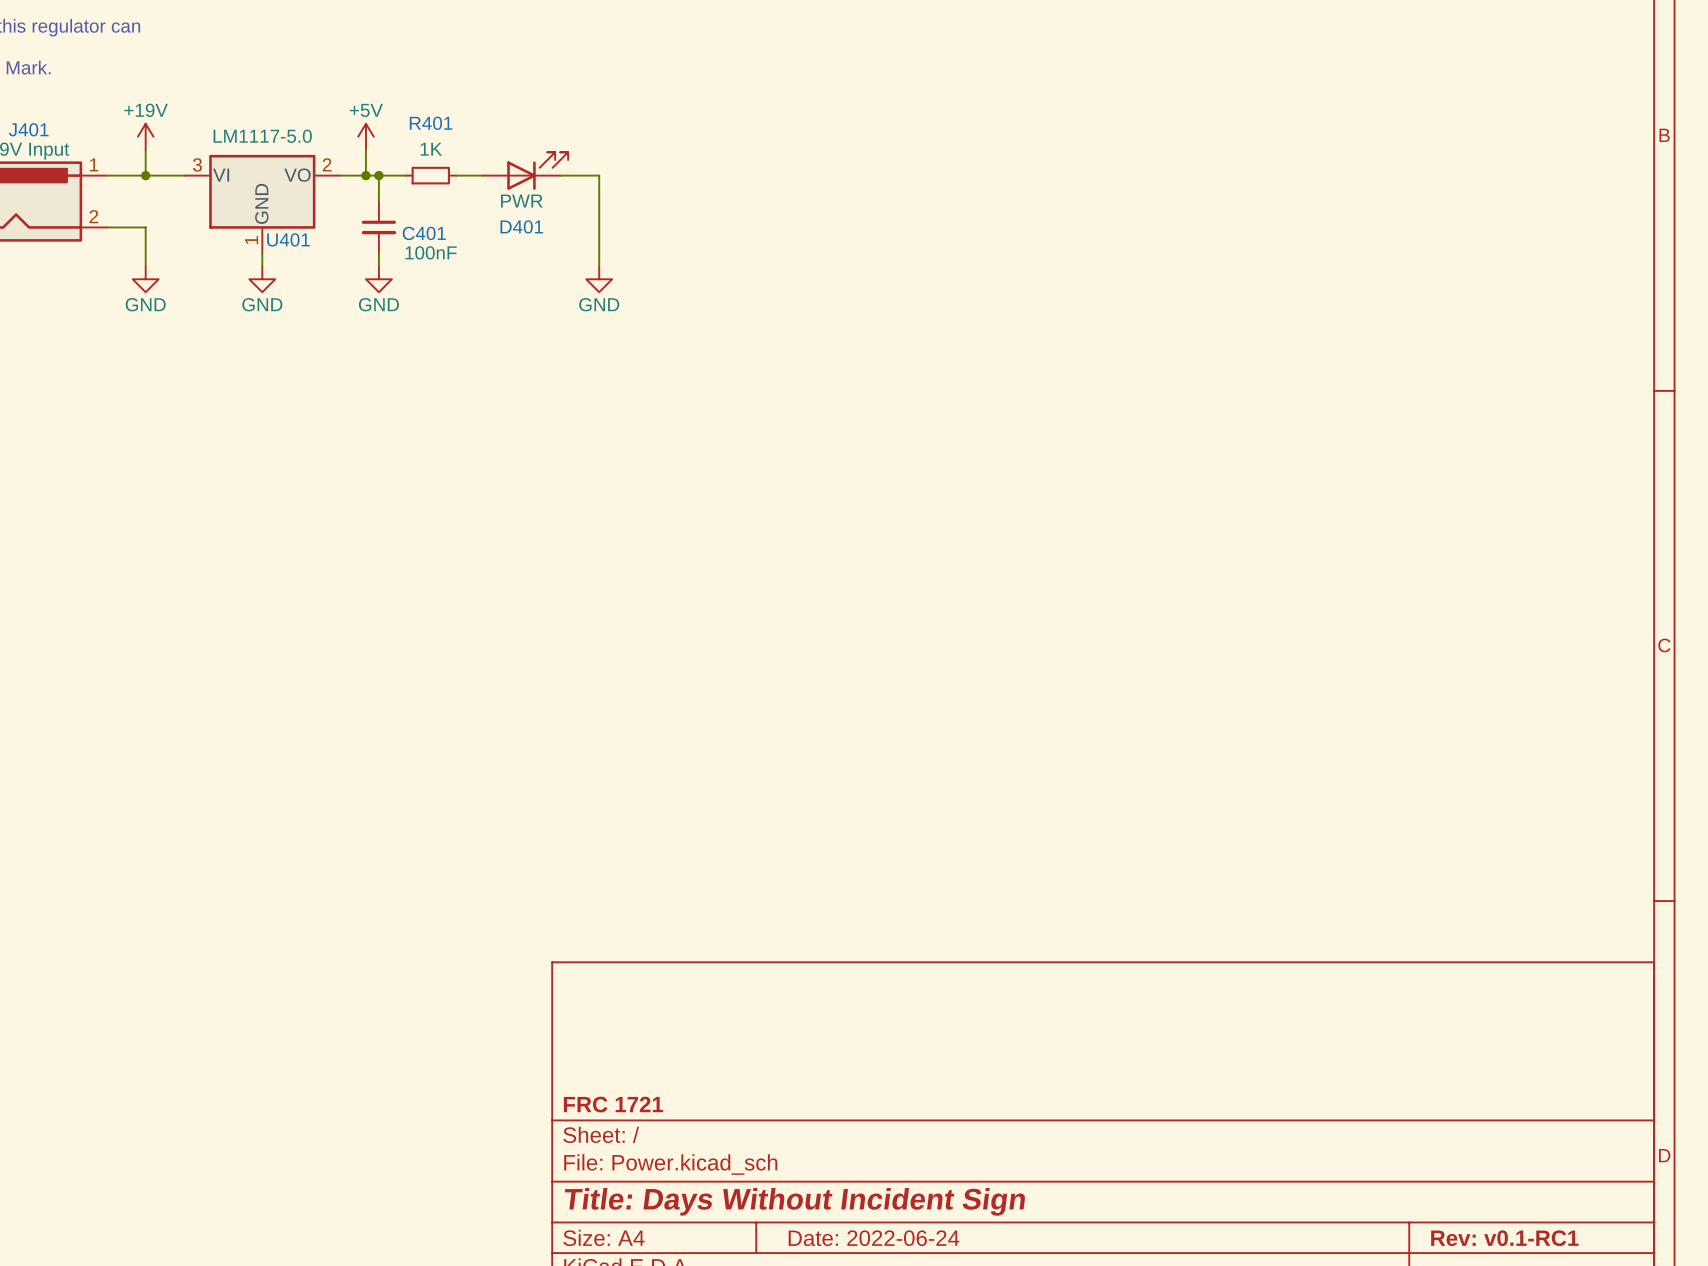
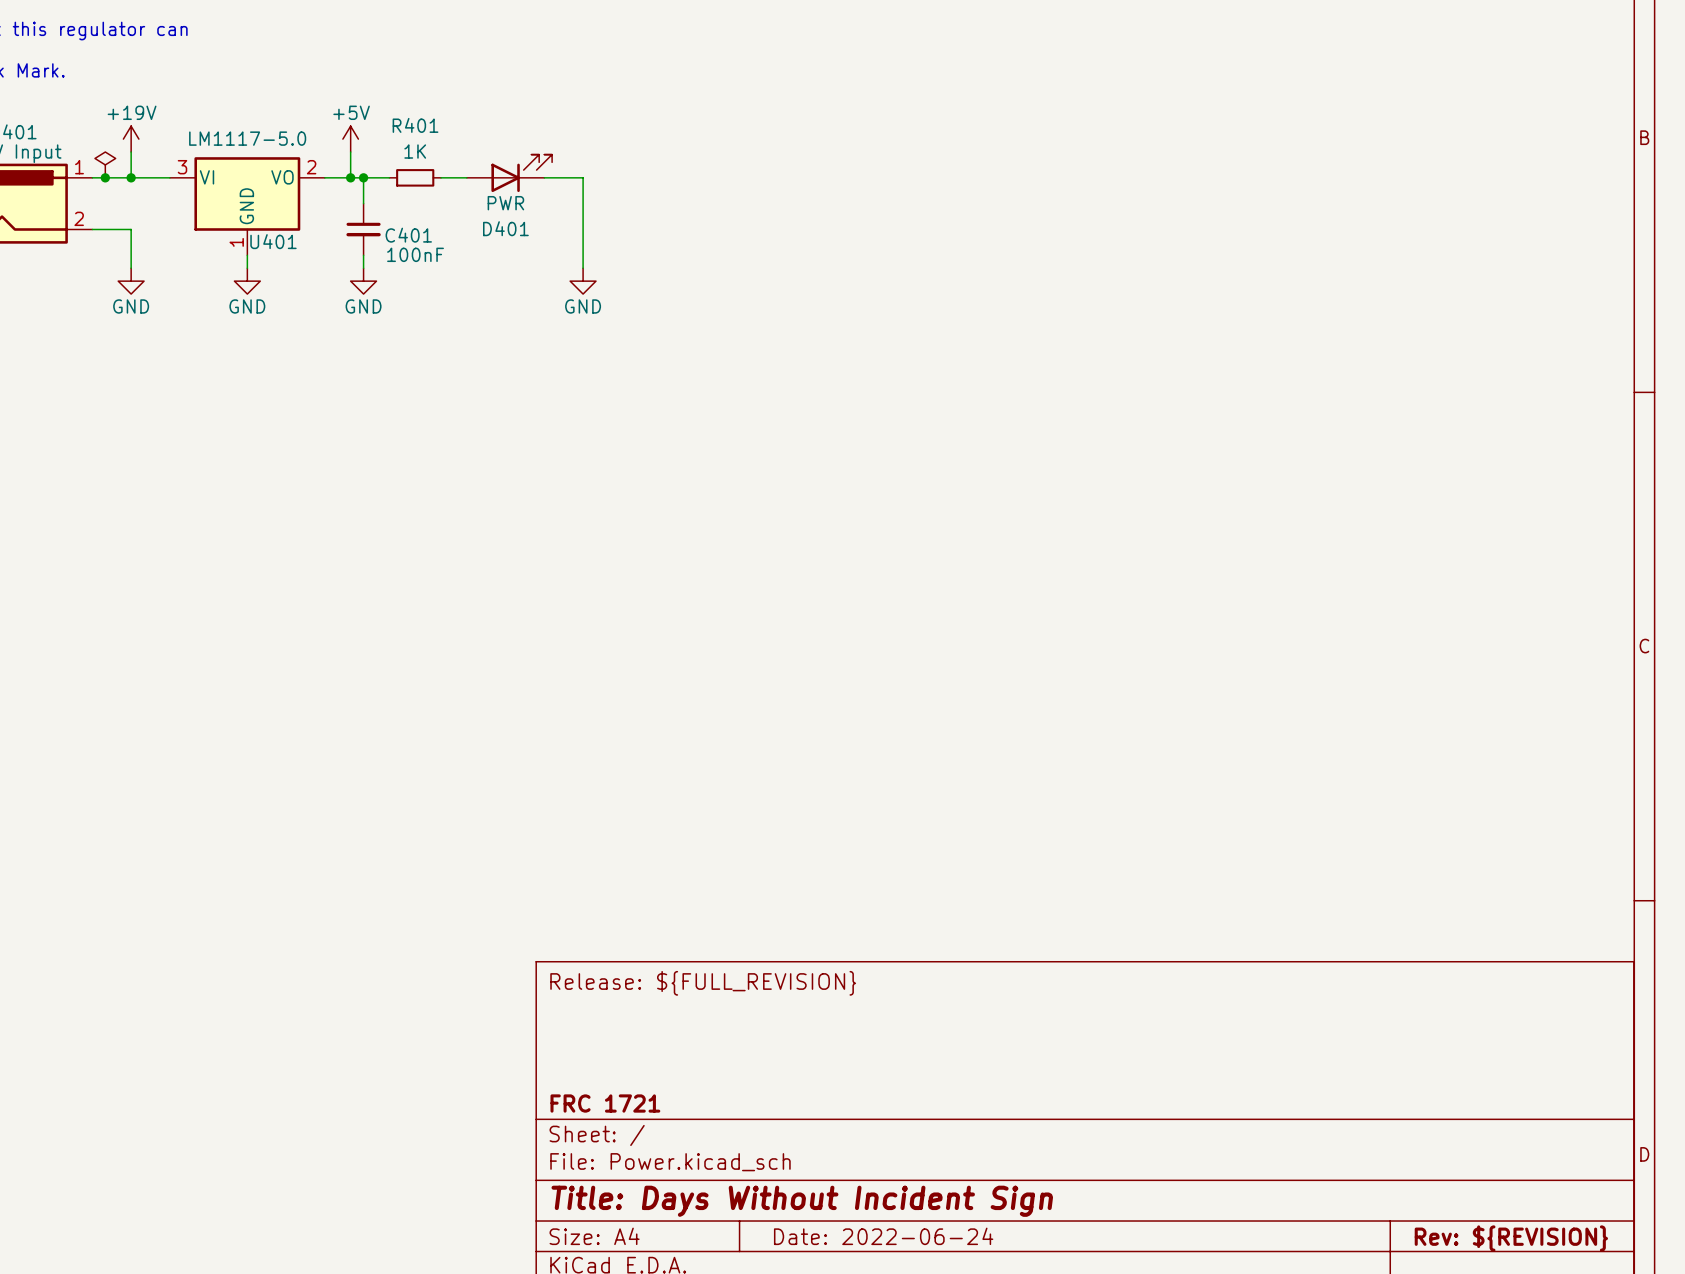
power symbol: none -> (105, 164)
junction: none -> (105, 177)
title block: none -> Release: ${FULL_REVISION} (703, 983)
title block: Rev: v0.1-RC1 (1504, 1238) -> Rev: ${REVISION} (1511, 1238)

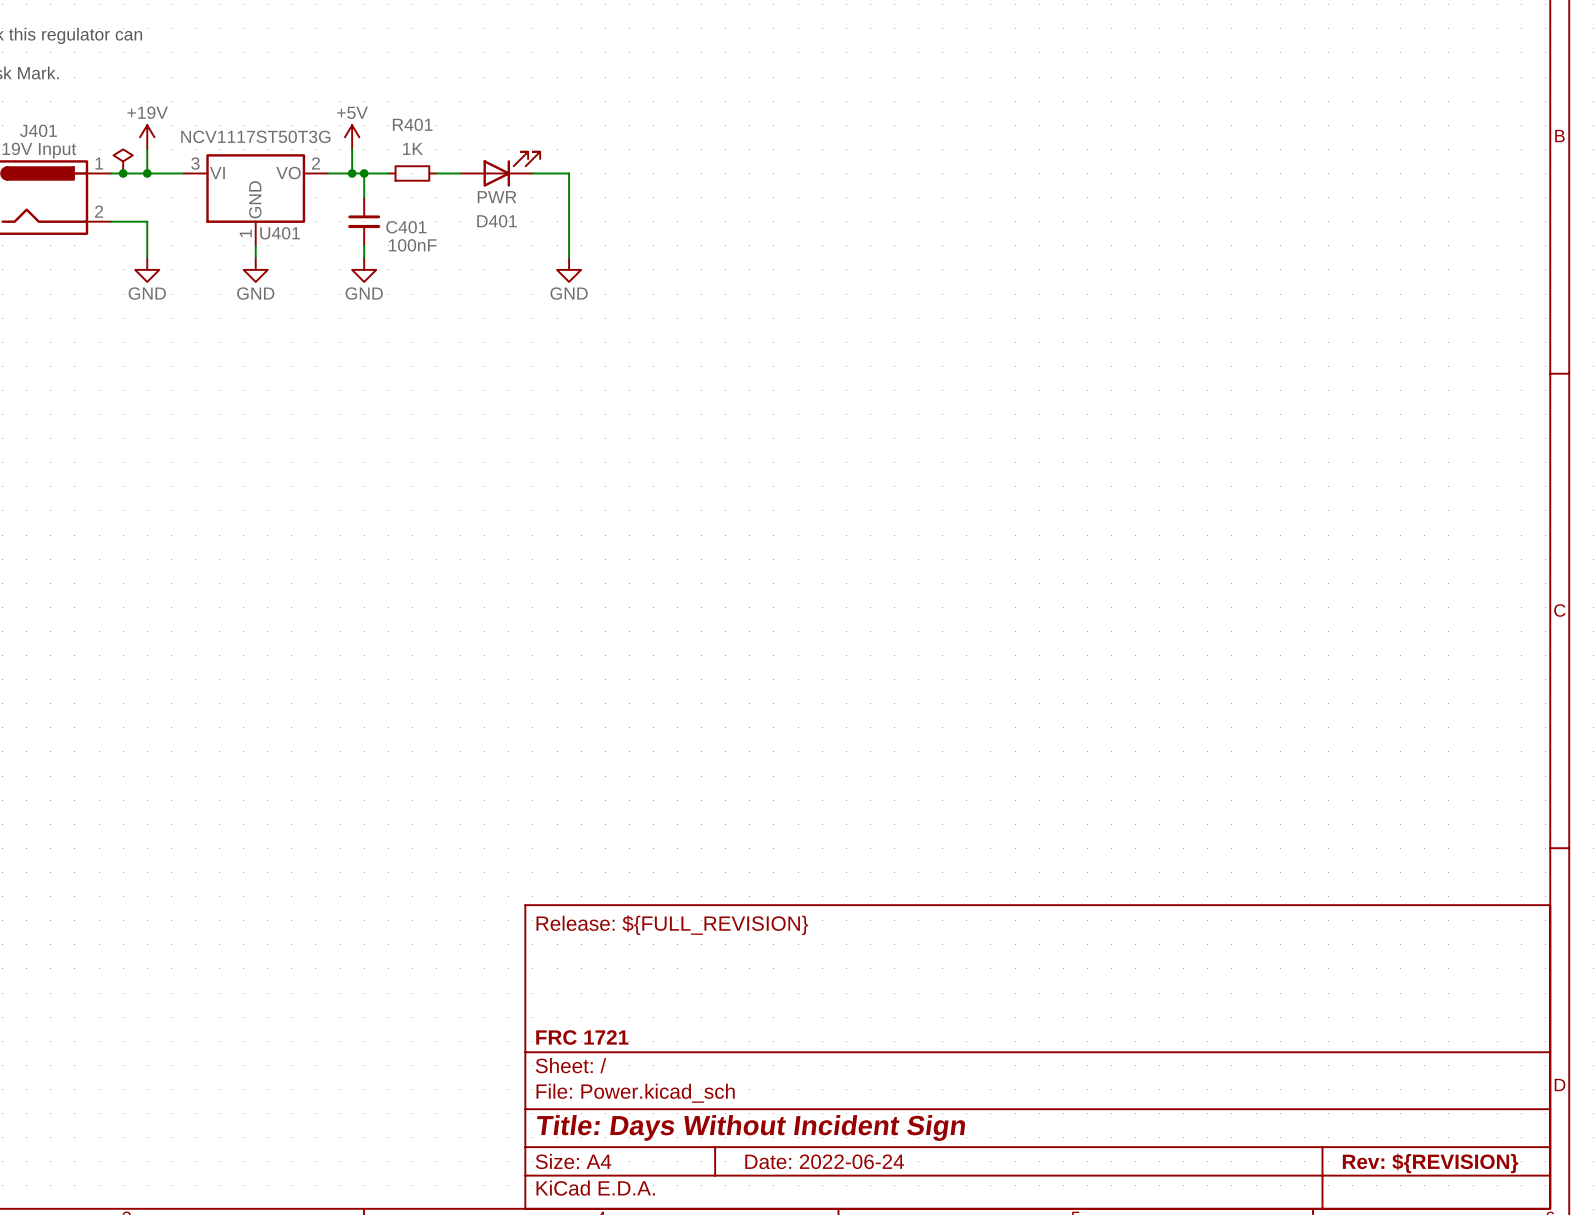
U401 value: LM1117-5.0 (247, 138) -> NCV1117ST50T3G (255, 136)

